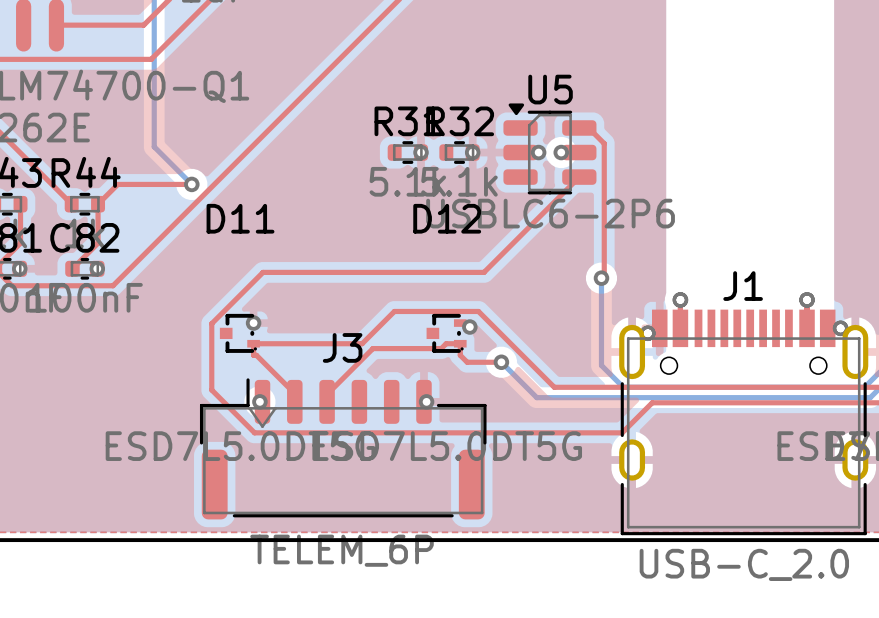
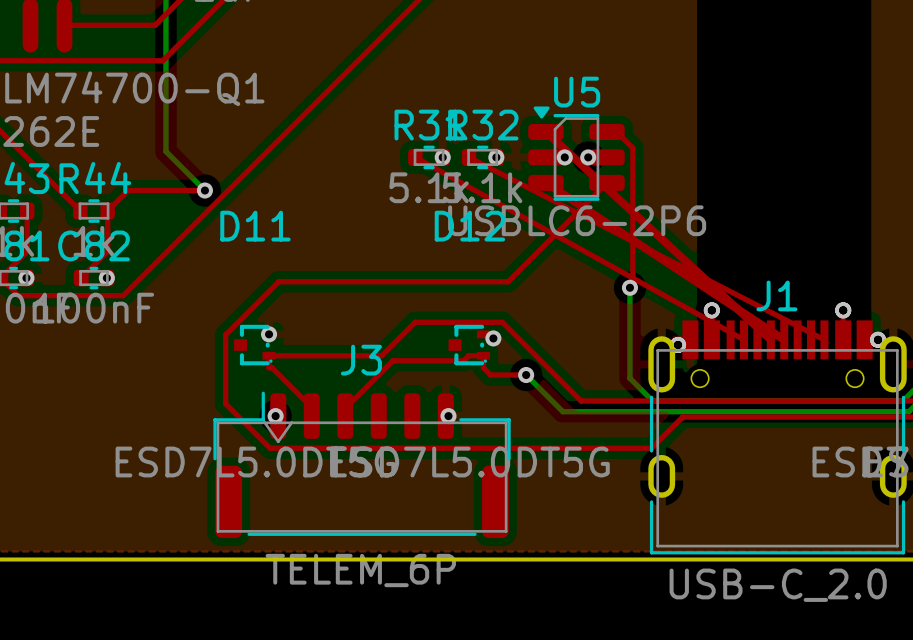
top track: none -> (546, 131) (770, 339)
top track: none -> (415, 157) (744, 339)
top track: none -> (469, 157) (824, 339)
top track: none -> (546, 182) (784, 339)

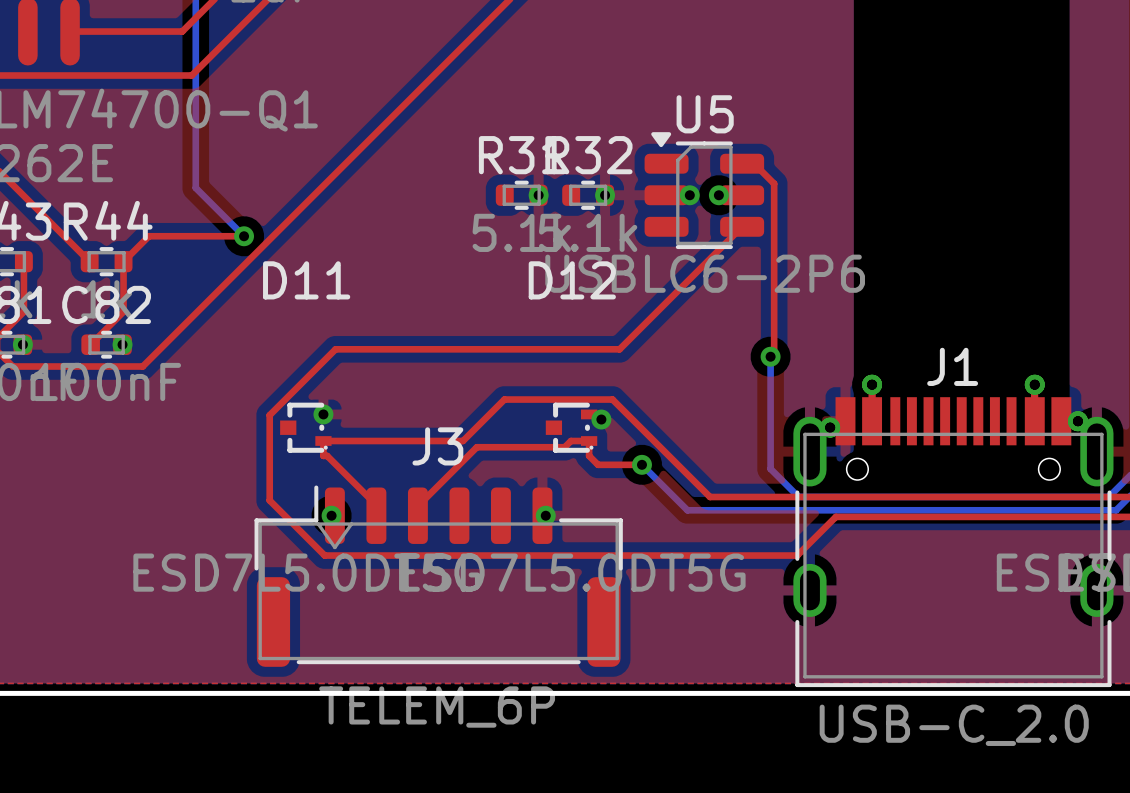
top track: (546, 131) (770, 339) -> none
top track: (415, 157) (744, 339) -> none
top track: (469, 157) (824, 339) -> none
top track: (546, 182) (784, 339) -> none

